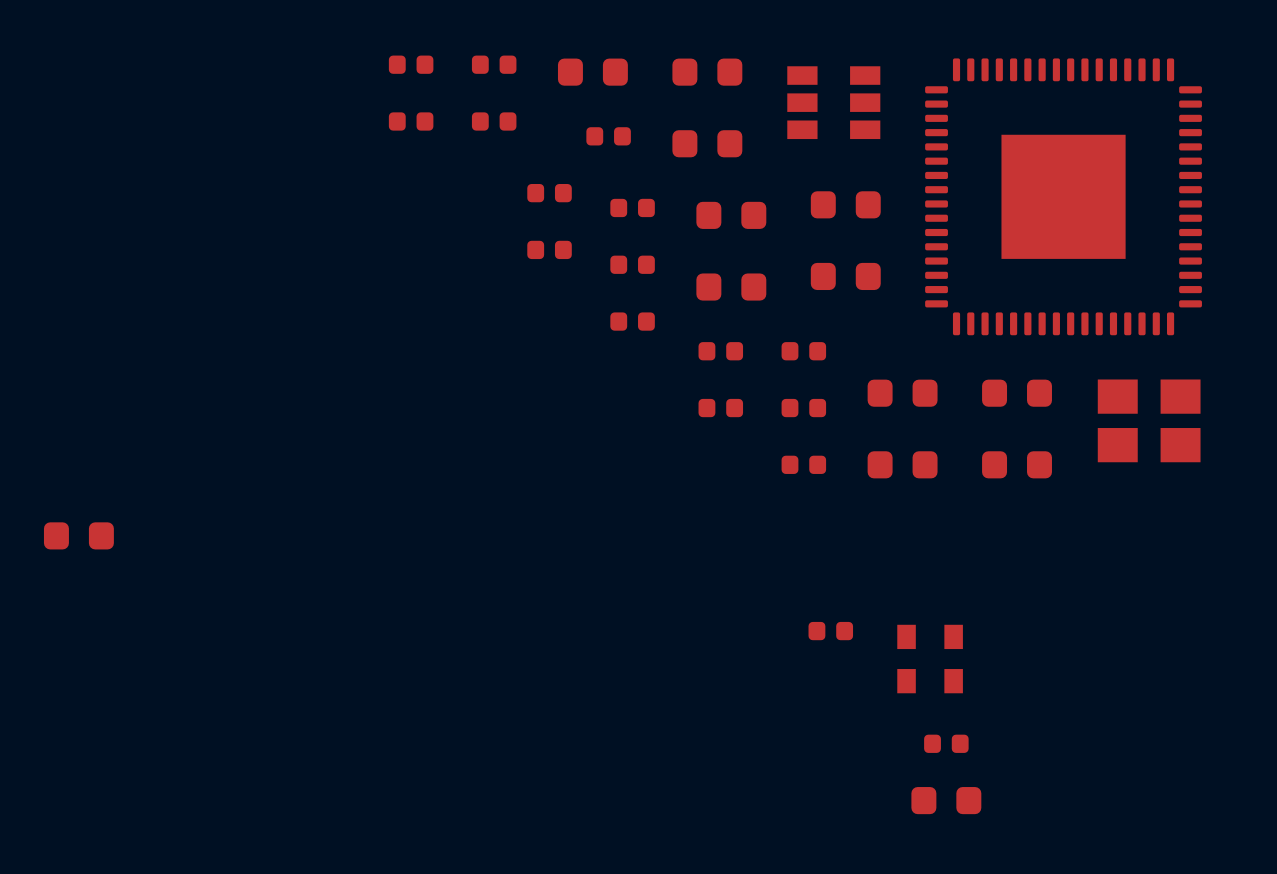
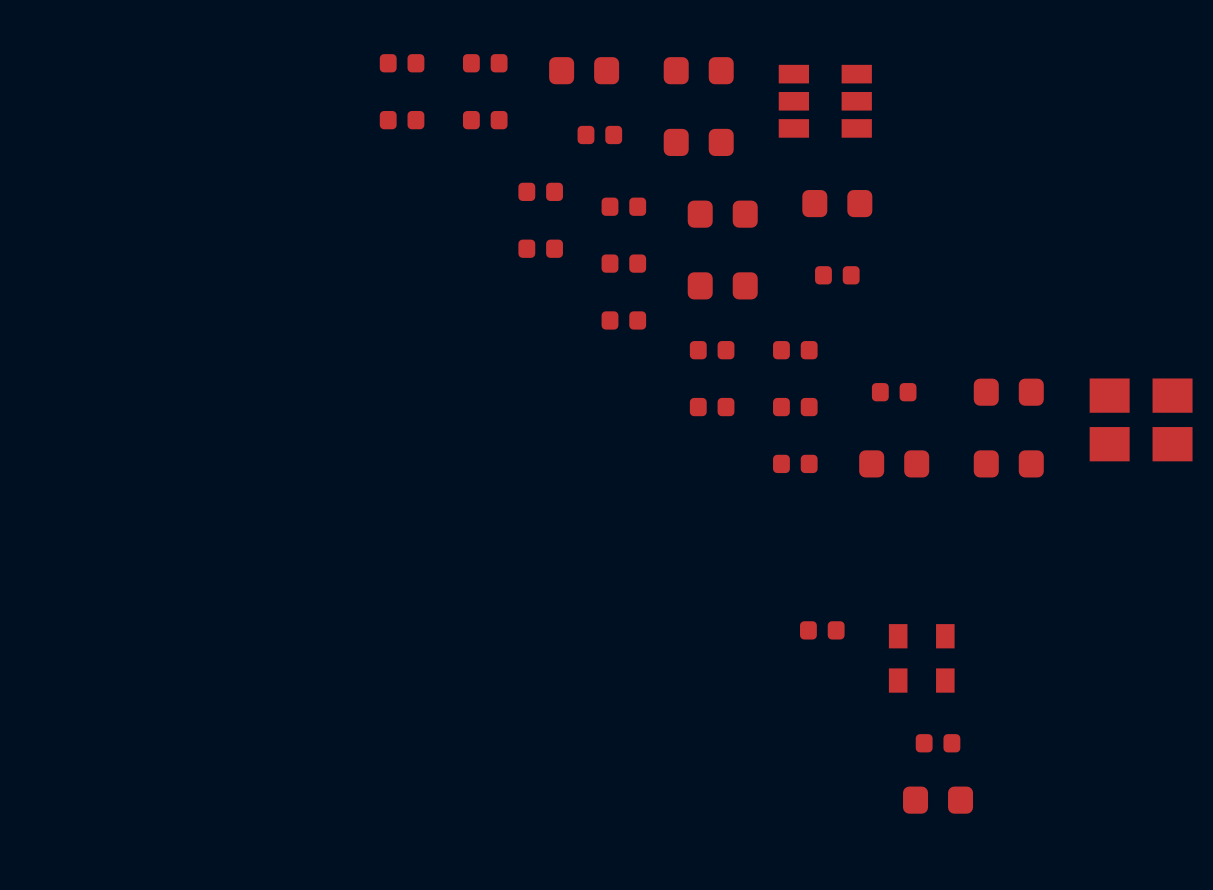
part: (1063, 196) -> none
part footprint: [810, 262, 881, 291] -> [815, 266, 860, 285]
part footprint: [867, 379, 938, 407] -> [871, 383, 917, 402]
part: (78, 535) -> none

